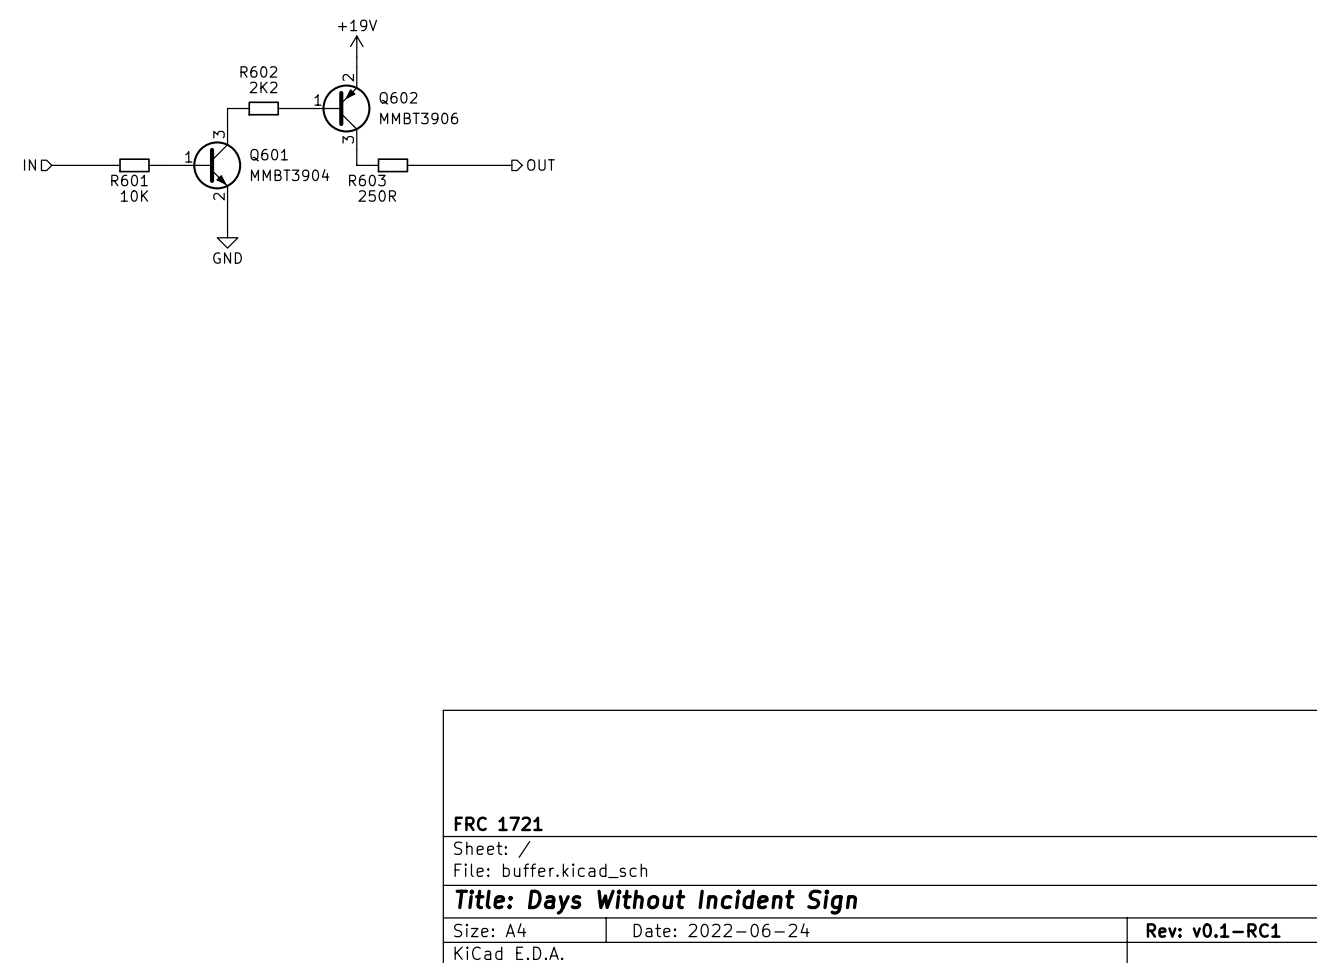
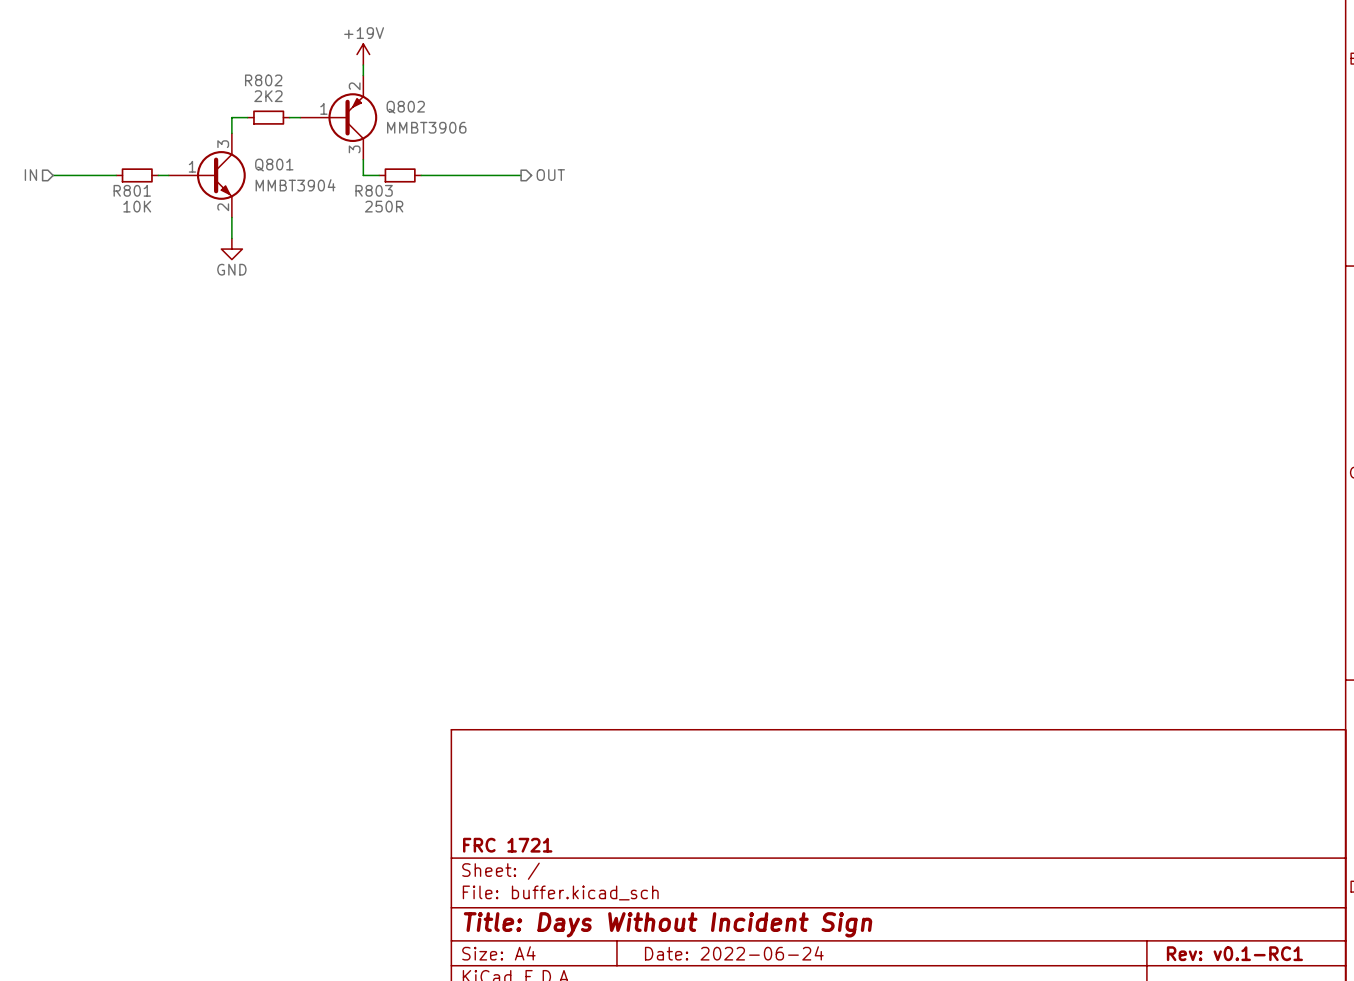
R602 name: R602 (258, 71) -> R802 (263, 80)
Q602 name: Q602 (398, 98) -> Q802 (405, 107)
Q601 name: Q601 (269, 155) -> Q801 (274, 165)
R601 name: R601 (129, 180) -> R801 (132, 190)
R603 name: R603 (367, 180) -> R803 (374, 190)

